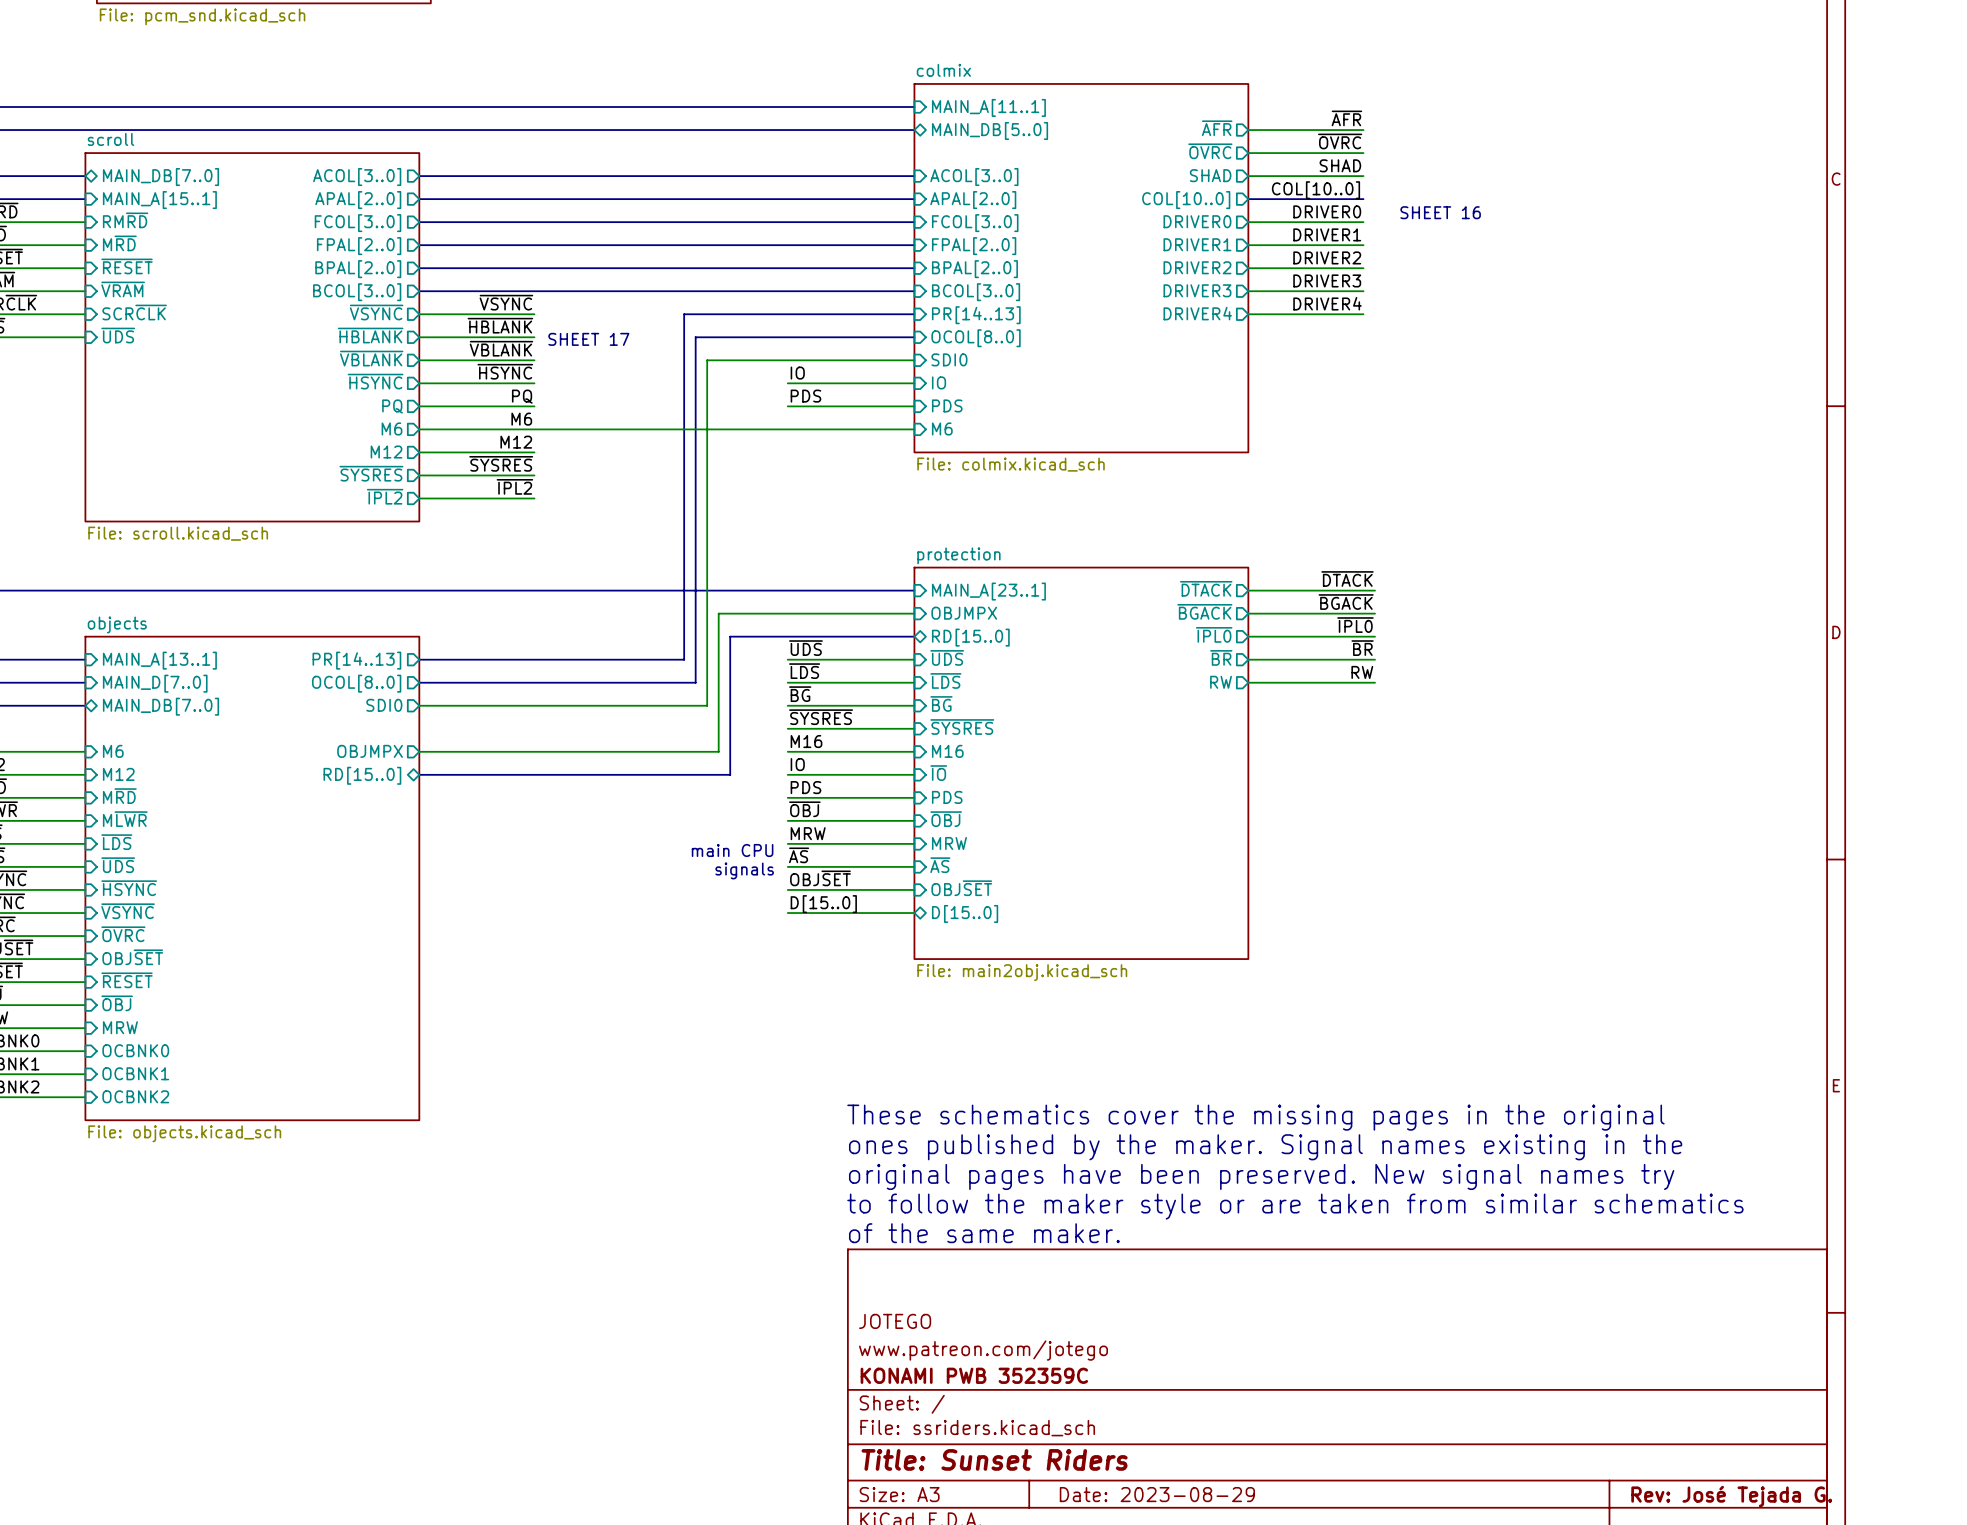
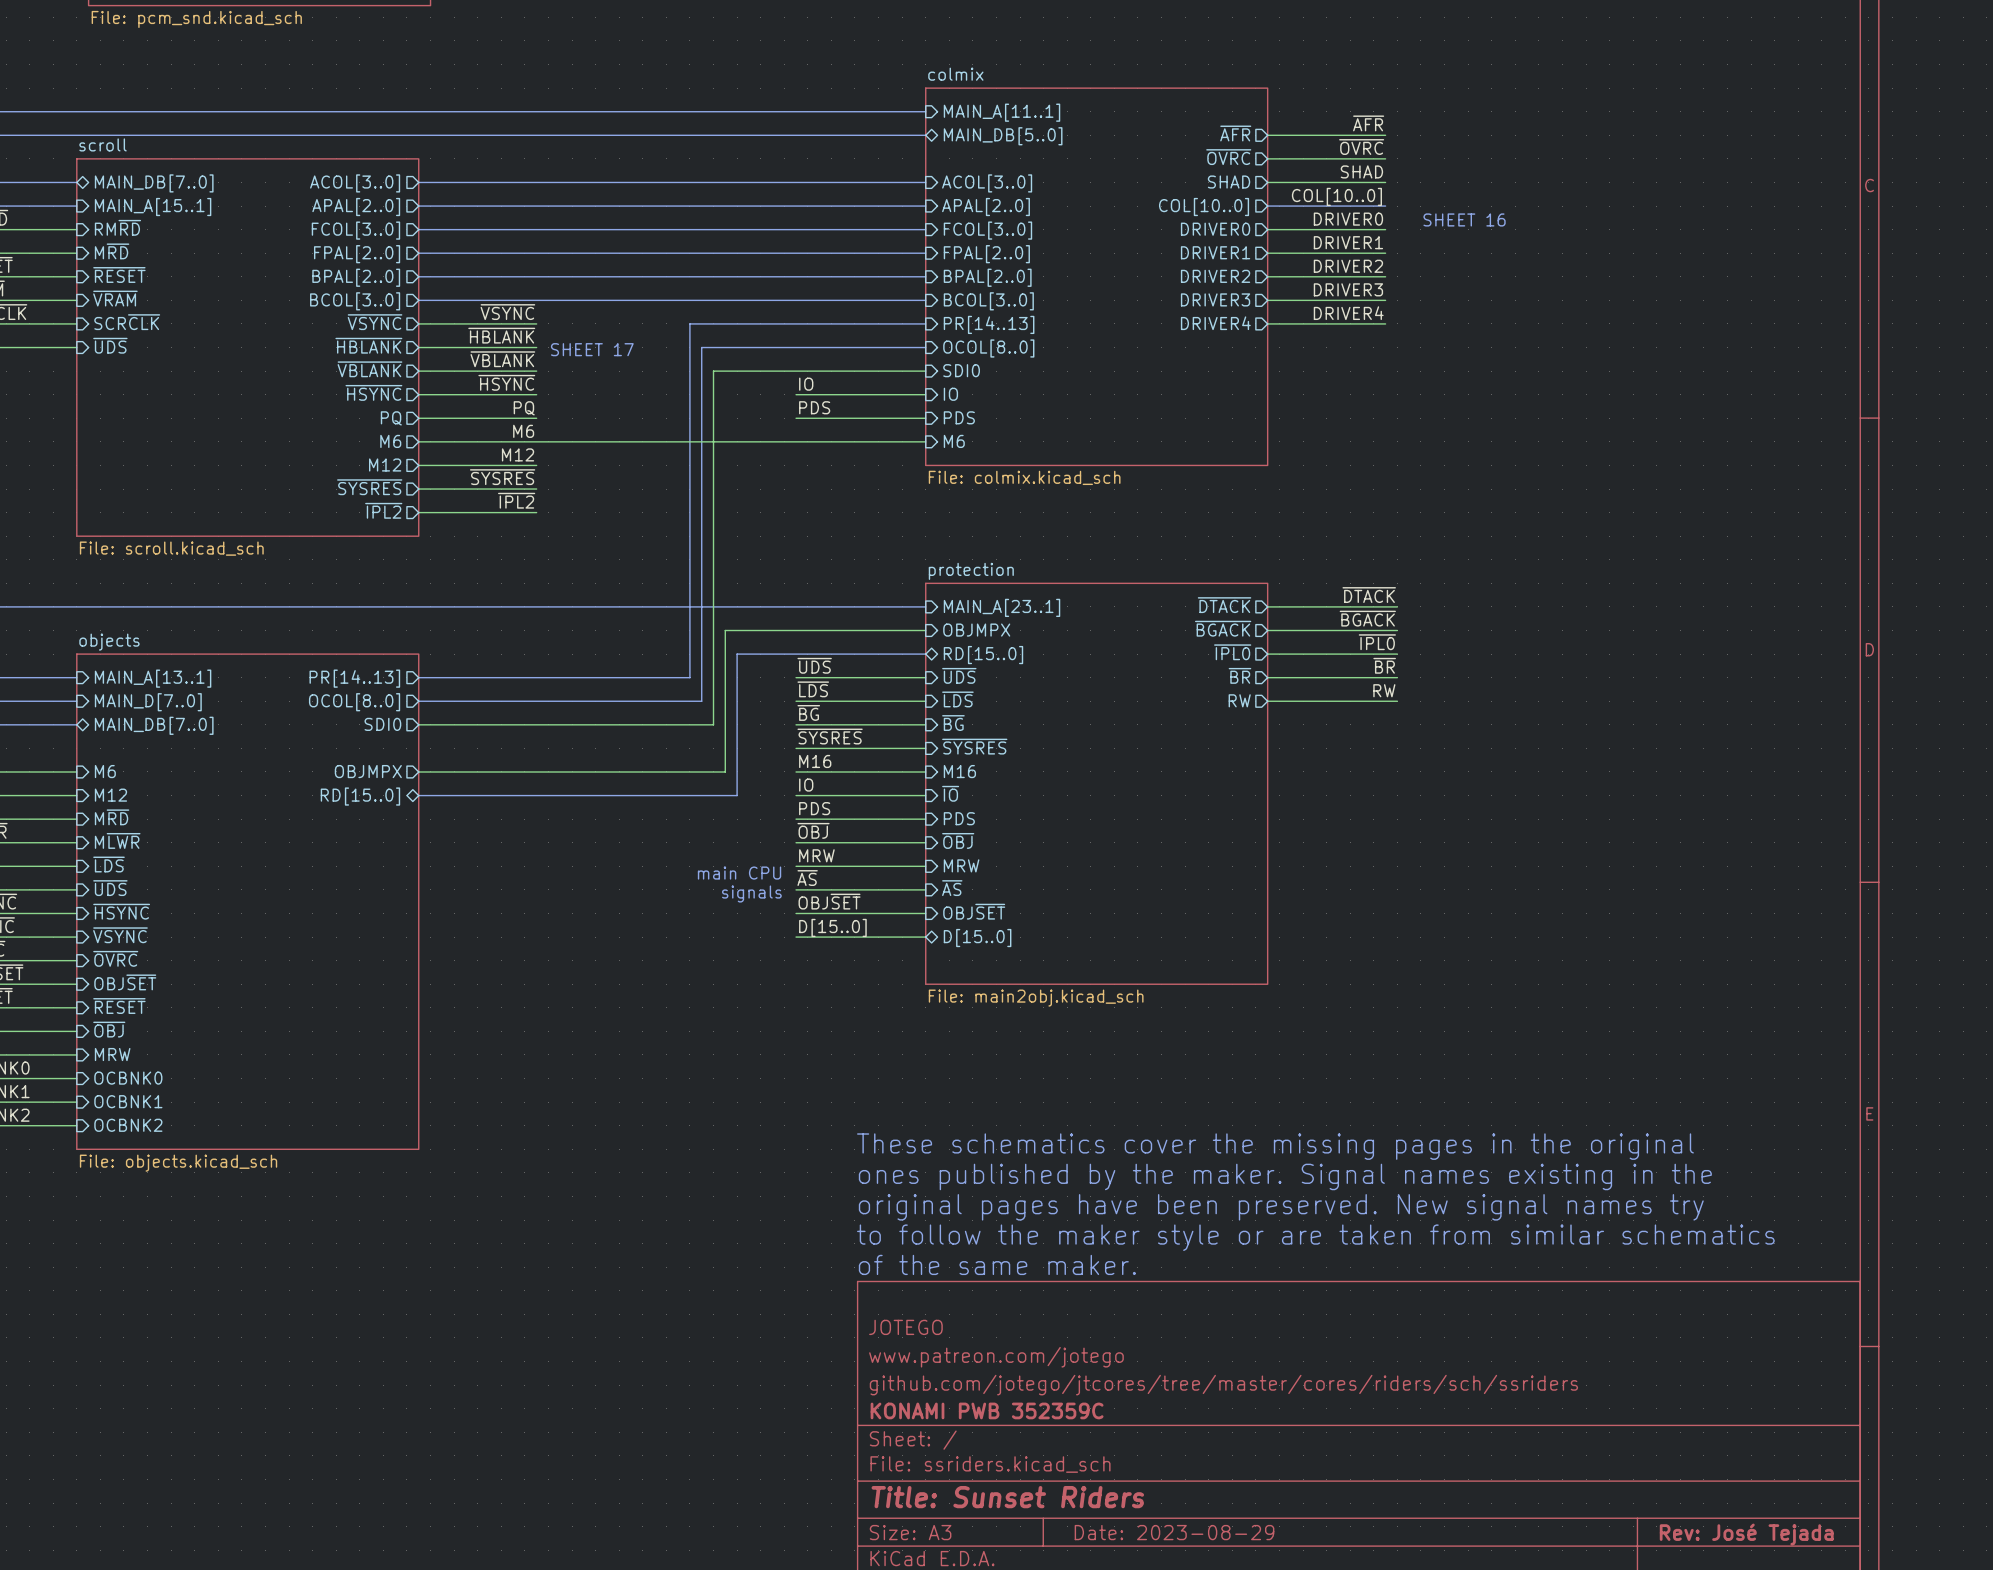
title block: none -> JOTEGO (905, 1327)
title block: JOTEGO (895, 1321) -> www.patreon.com/jotego (996, 1357)
title block: www.patreon.com/jotego (983, 1350) -> github.com/jotego/jtcores/tree/master/cores/riders/sch/ssriders (1223, 1385)
title block: Rev: José Tejada G. (1731, 1496) -> Rev: José Tejada (1746, 1534)

